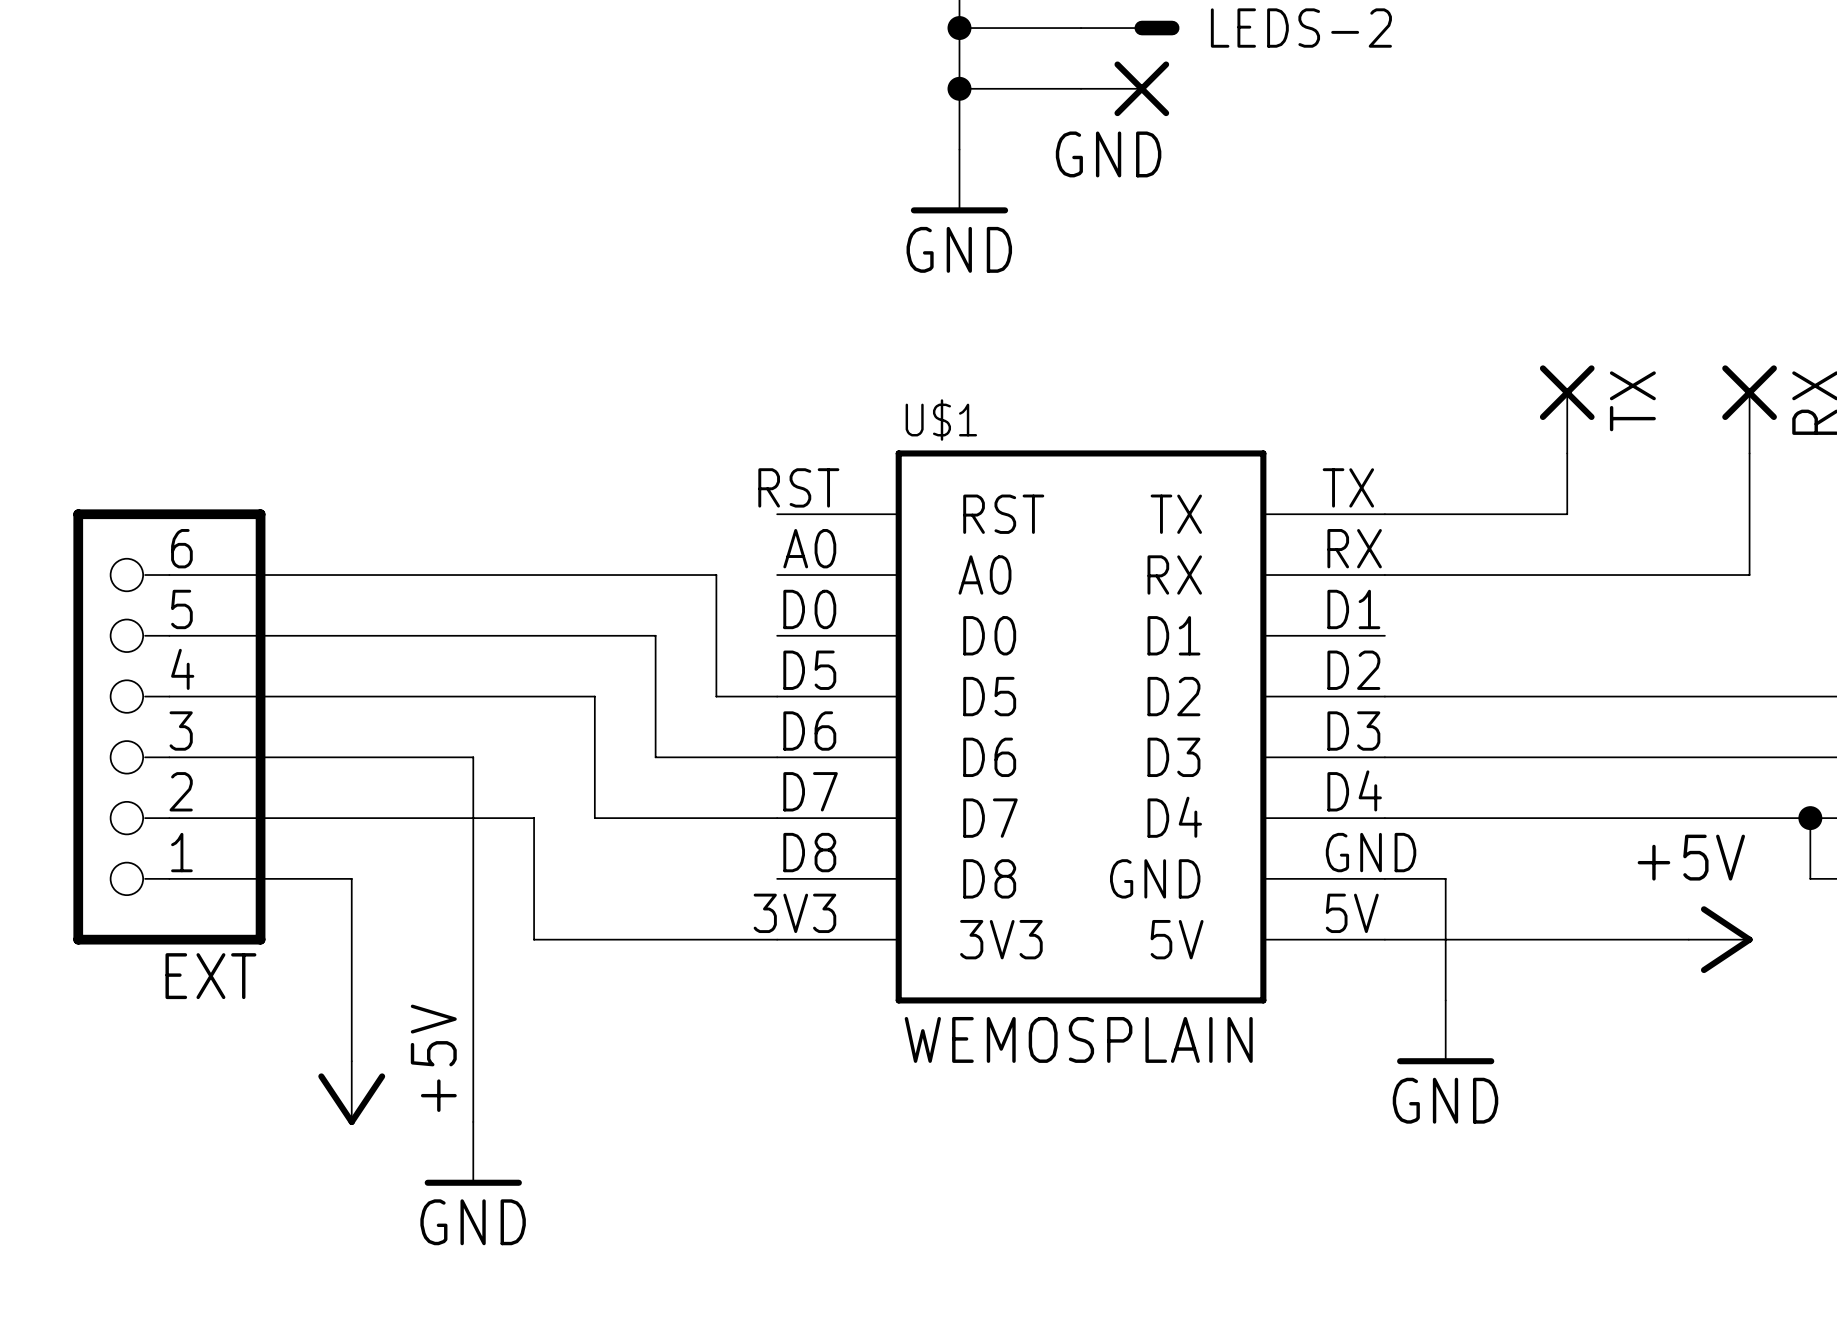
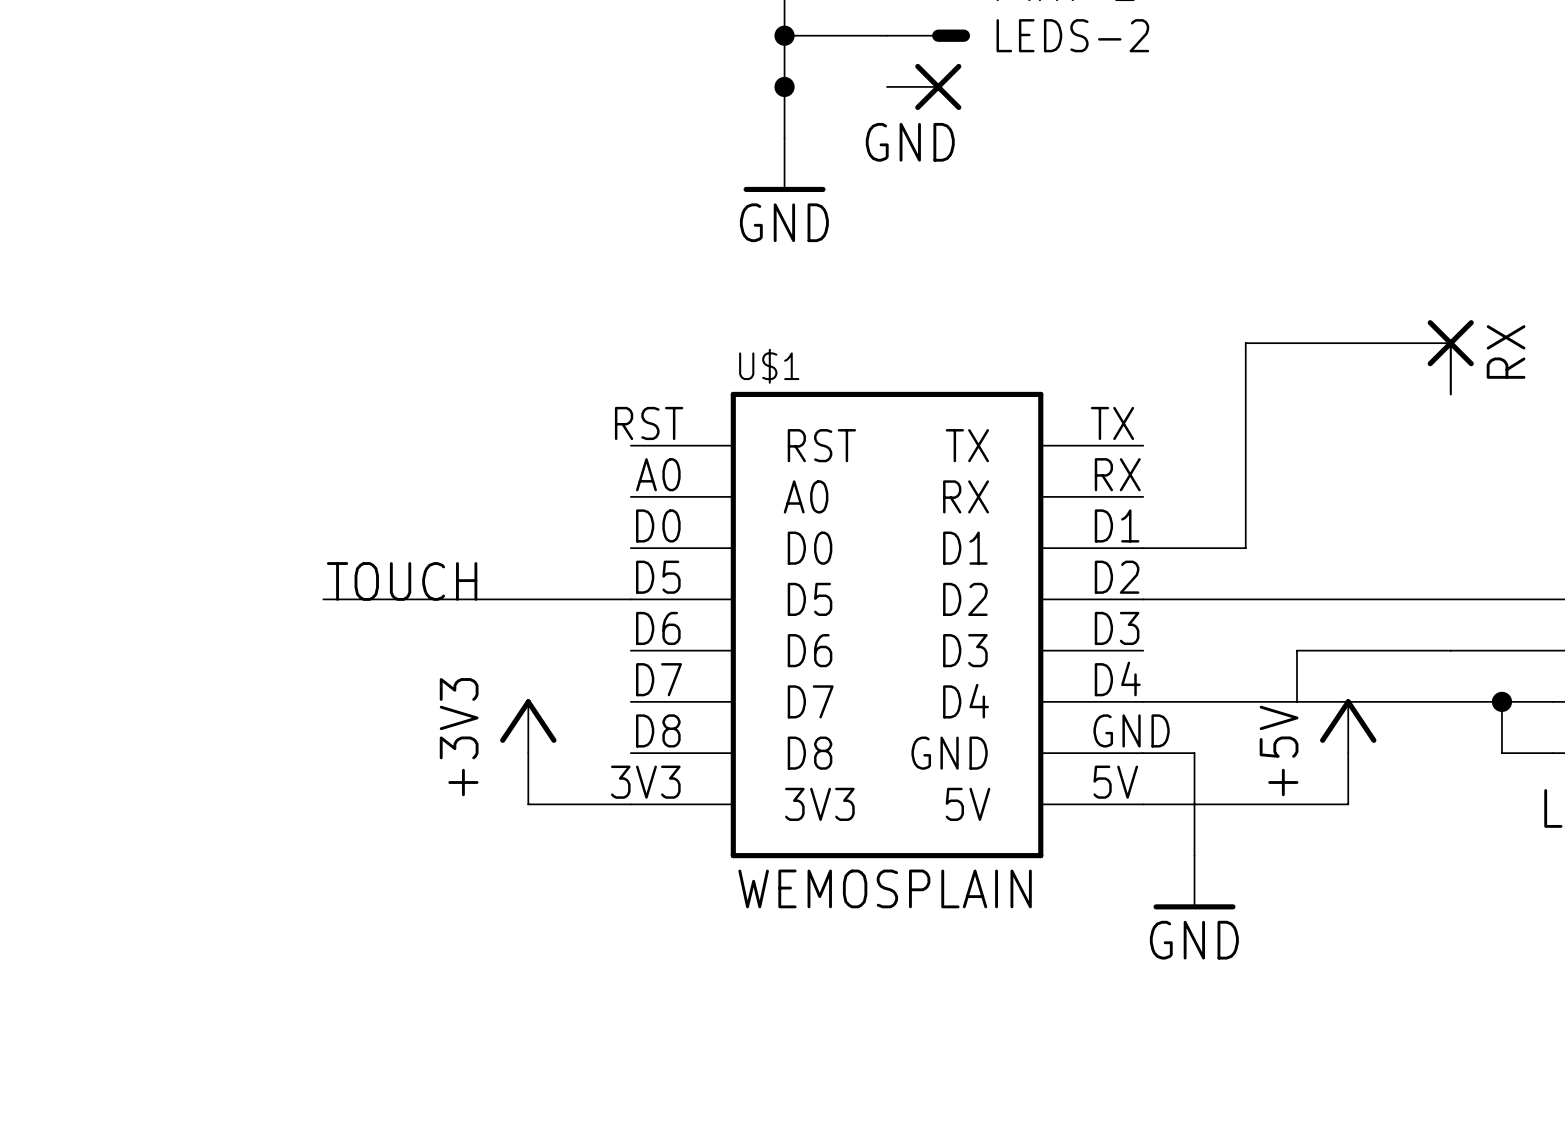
wire: (959, 88) (1081, 88) -> none
TX: (1567, 409) -> none
wire: (1567, 453) (1567, 514) (1384, 514) -> none
wire: (1749, 453) (1749, 575) (1384, 575) -> (1450, 394) (1450, 343) (1245, 343) (1245, 548) (1143, 548)
wire: (169, 575) (716, 575) (716, 696) -> none
wire: (169, 635) (655, 635) (655, 757) (777, 757) -> none
label: none -> TOUCH (402, 581)
wire: (169, 696) (412, 696) -> none
wire: (594, 696) (594, 818) (777, 818) -> (477, 599) (579, 599)
EXT: (169, 726) -> none
wire: (169, 757) (473, 757) (473, 1121) -> none
wire: (1384, 757) (1567, 757) -> (1297, 701) (1297, 650)
wire: (169, 818) (534, 818) (534, 939) (655, 939) -> (528, 753) (528, 804)
power symbol: none -> +3V3 (528, 726)
wire: (169, 878) (351, 878) (351, 1061) -> none
wire: (1628, 939) (1688, 939) -> (1348, 804) (1348, 753)
power symbol position: +5V (1720, 939) -> +5V (1348, 726)
power symbol rotation: 0° (1726, 939) -> 90° counterclockwise (1348, 721)
power symbol: +5V (351, 1093) -> none
power symbol: GND (473, 1153) -> none

